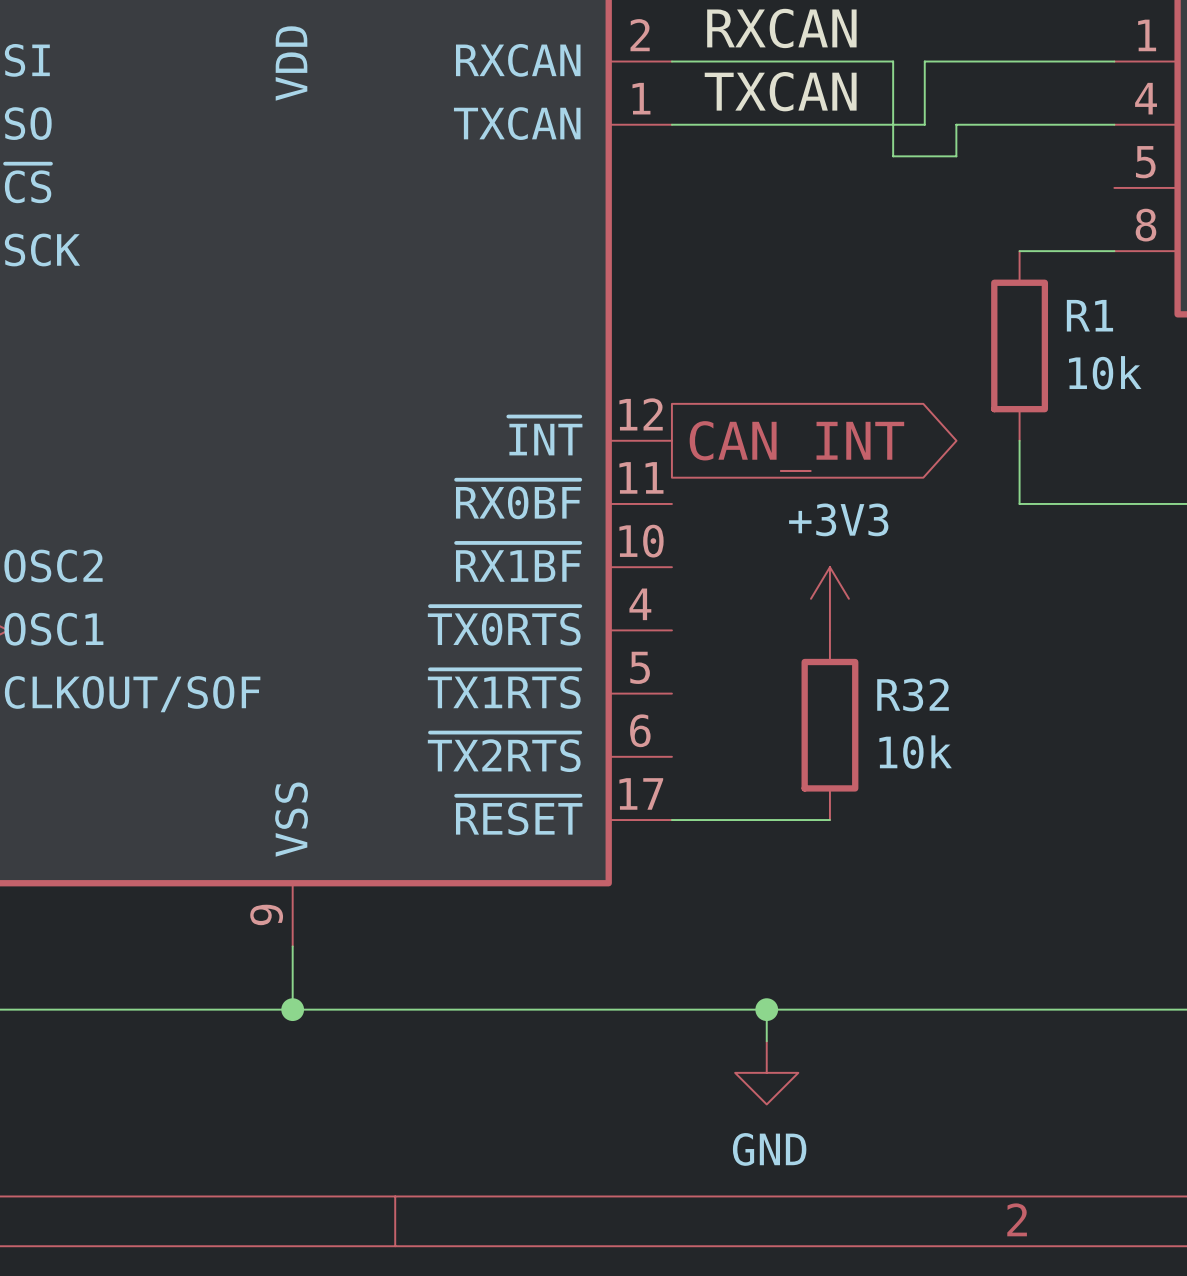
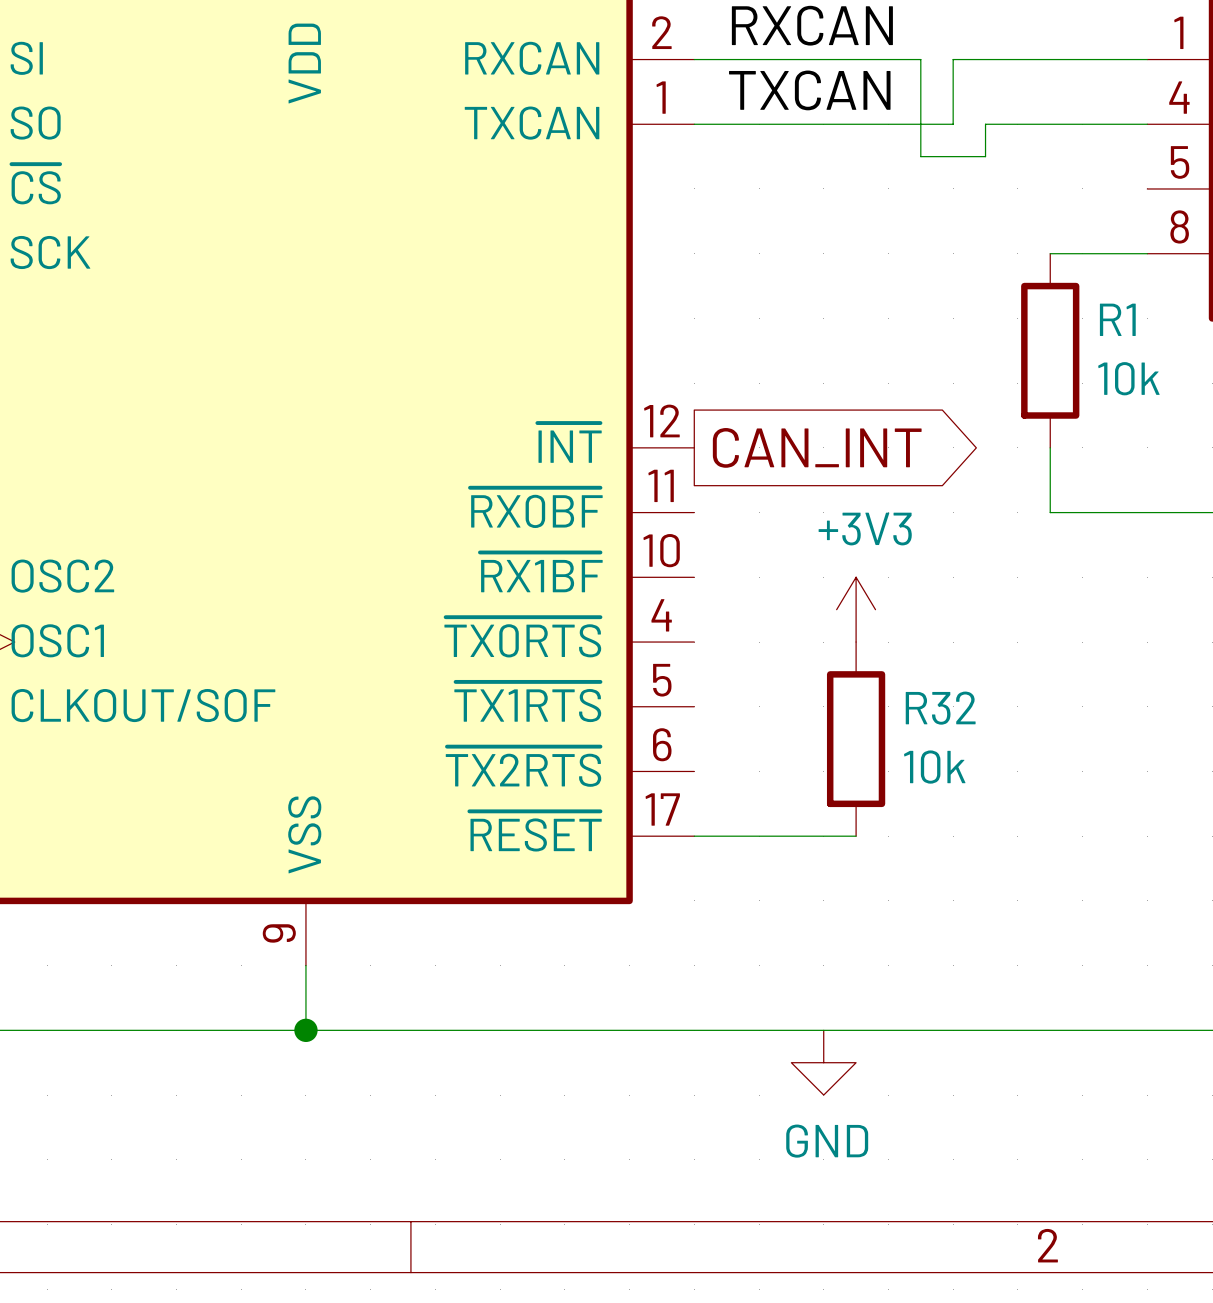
wire: (766, 1009) (766, 1041) -> none
junction: (766, 1009) -> none
power symbol position: GND (766, 1072) -> GND (823, 1062)

